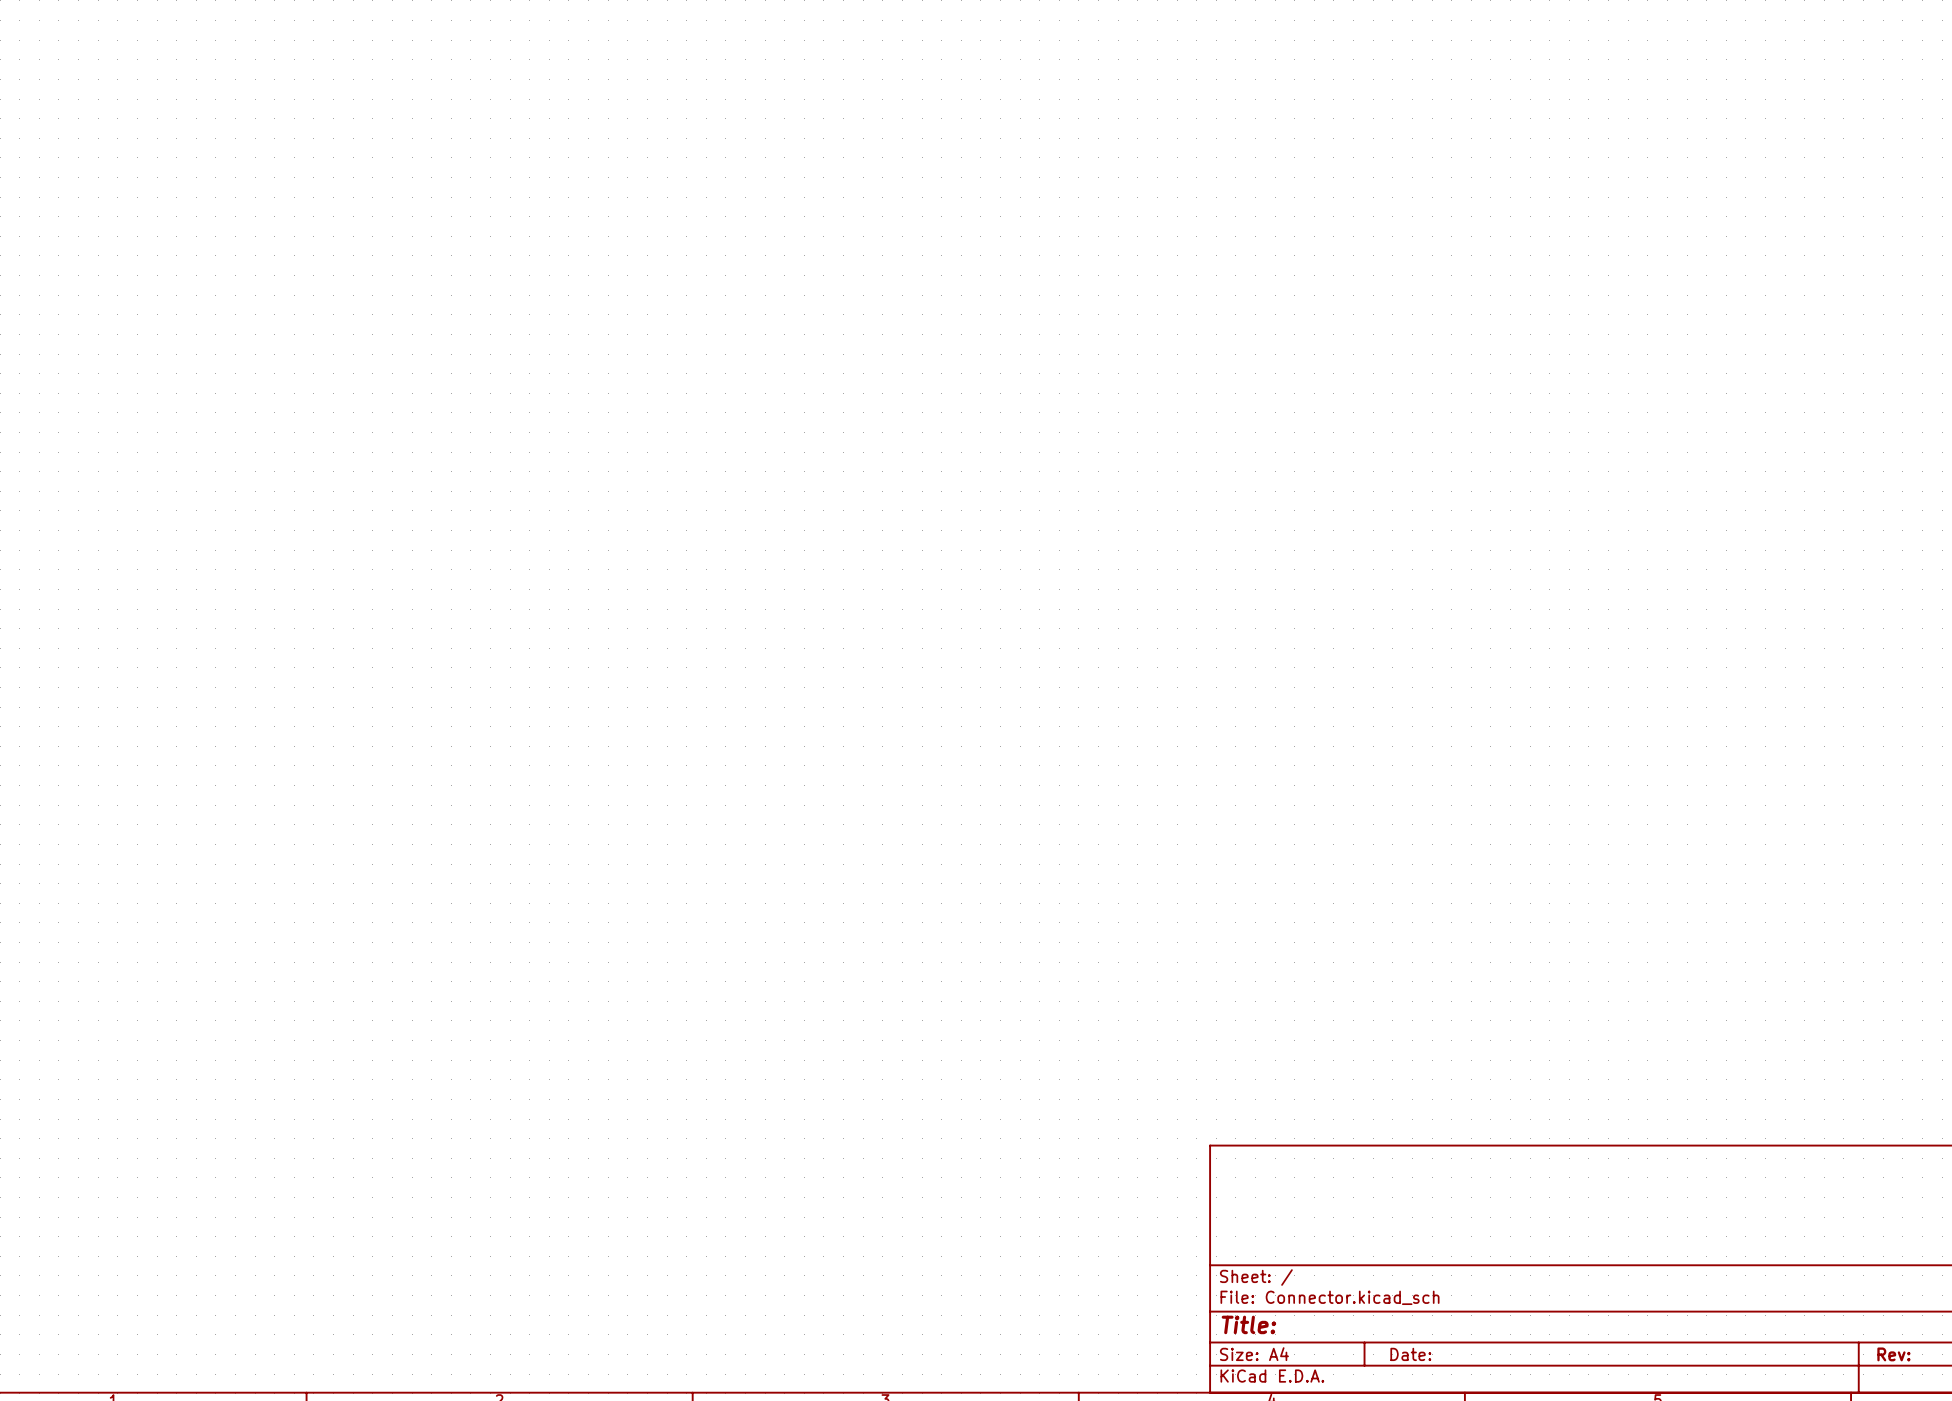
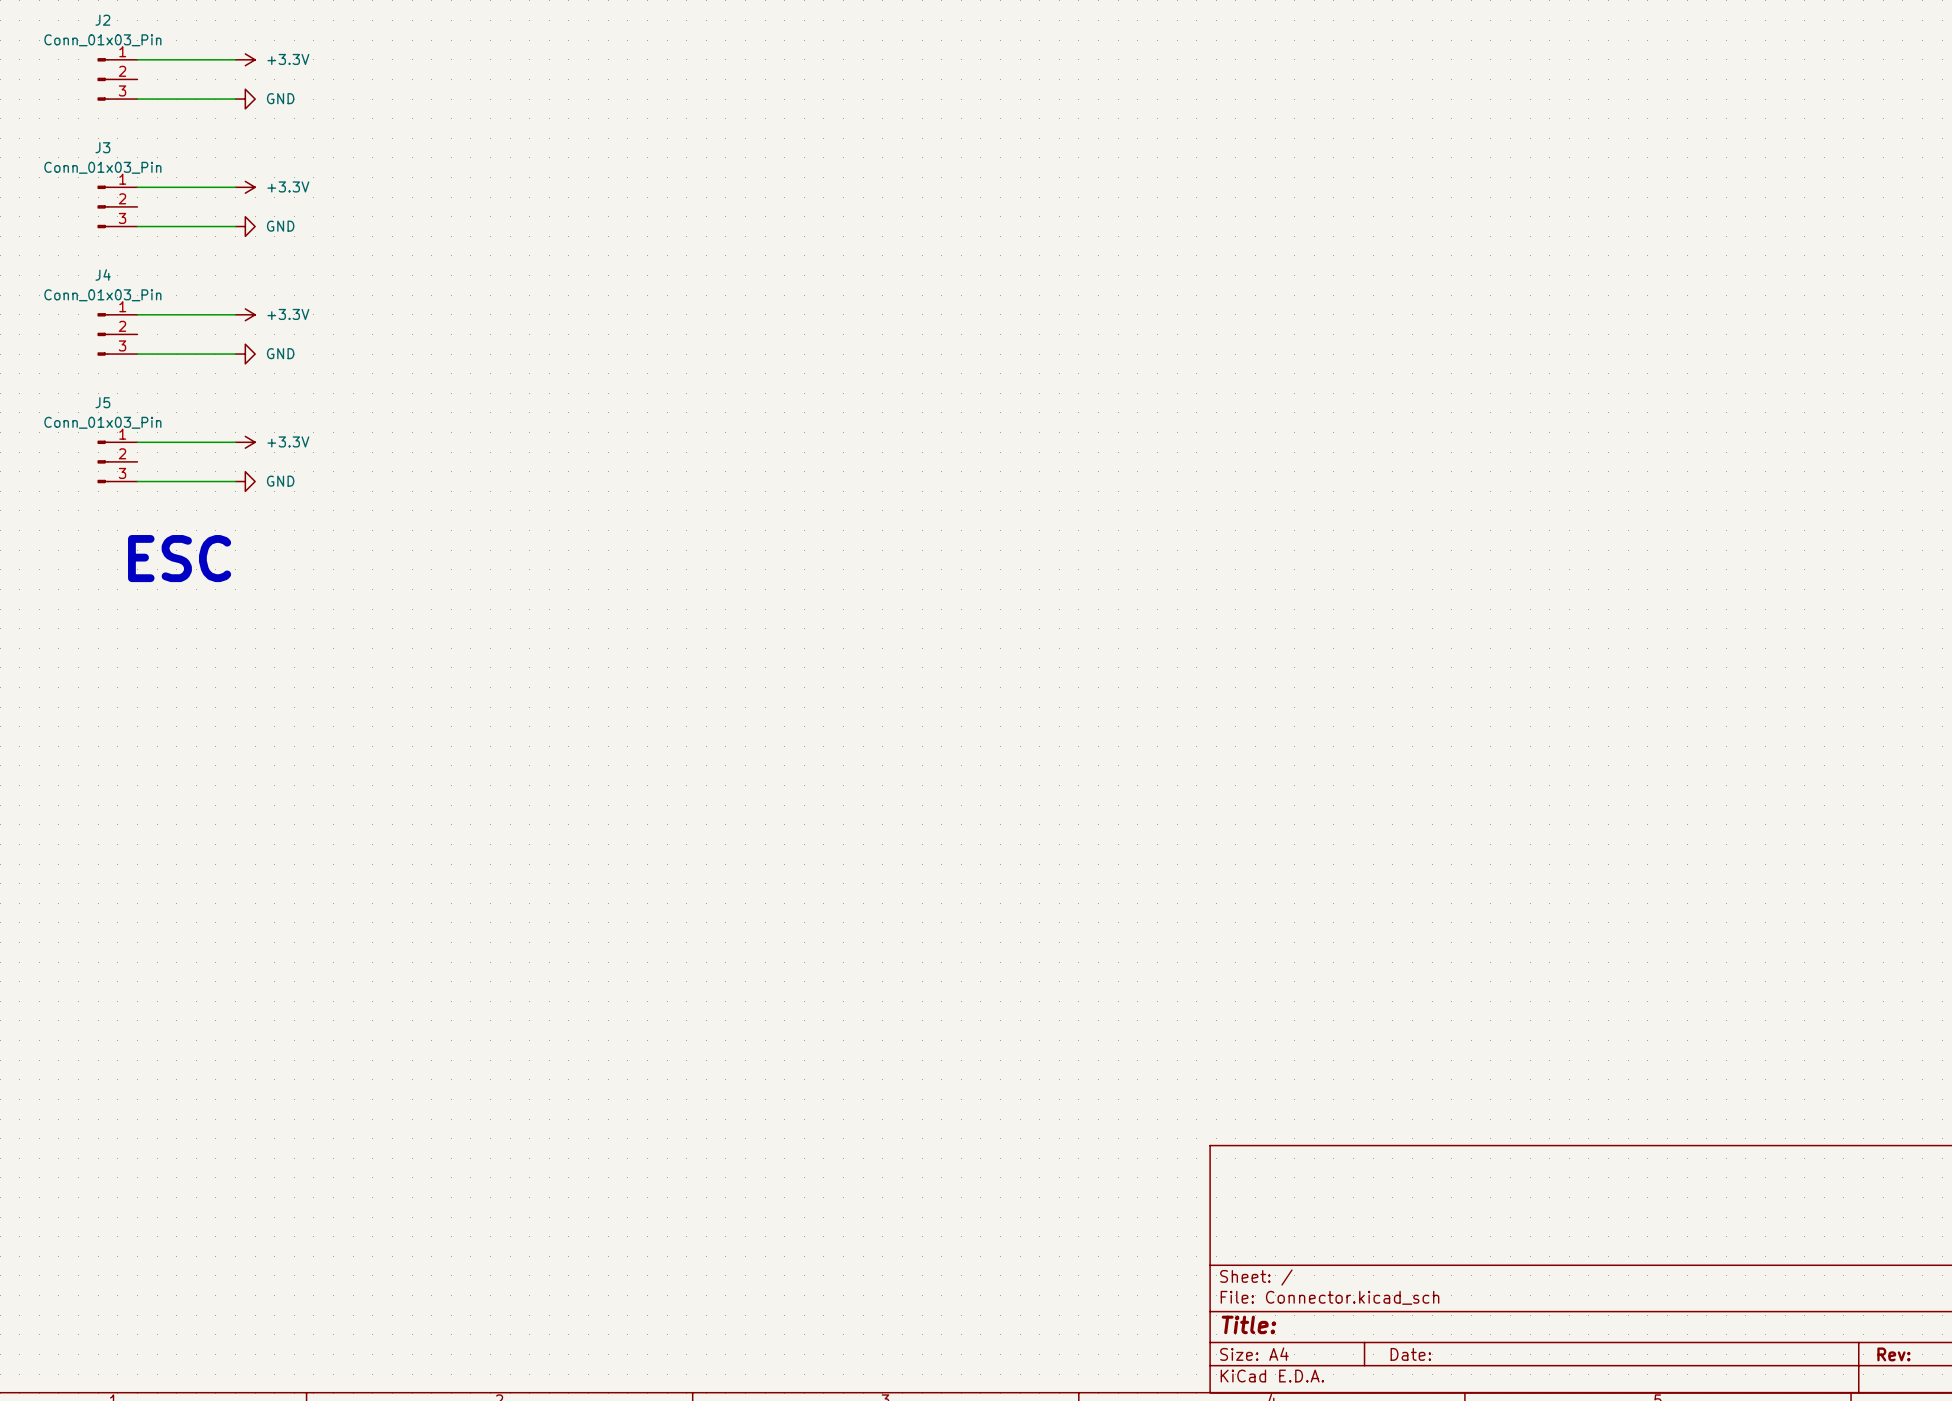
wire: none -> (137, 59) (235, 59)
power symbol: none -> +3.3V (245, 59)
J2: none -> Conn_01x03_Pin (117, 79)
wire: none -> (137, 99) (235, 99)
power symbol: none -> GND (245, 99)
wire: none -> (137, 187) (235, 187)
power symbol: none -> +3.3V (245, 187)
J3: none -> Conn_01x03_Pin (117, 206)
wire: none -> (137, 226) (235, 226)
power symbol: none -> GND (245, 226)
wire: none -> (137, 314) (235, 314)
power symbol: none -> +3.3V (245, 314)
J4: none -> Conn_01x03_Pin (117, 334)
wire: none -> (137, 354) (235, 354)
power symbol: none -> GND (245, 354)
wire: none -> (137, 442) (235, 442)
power symbol: none -> +3.3V (245, 442)
J5: none -> Conn_01x03_Pin (117, 461)
wire: none -> (137, 481) (235, 481)
power symbol: none -> GND (245, 481)
text: none -> ESC (179, 558)

